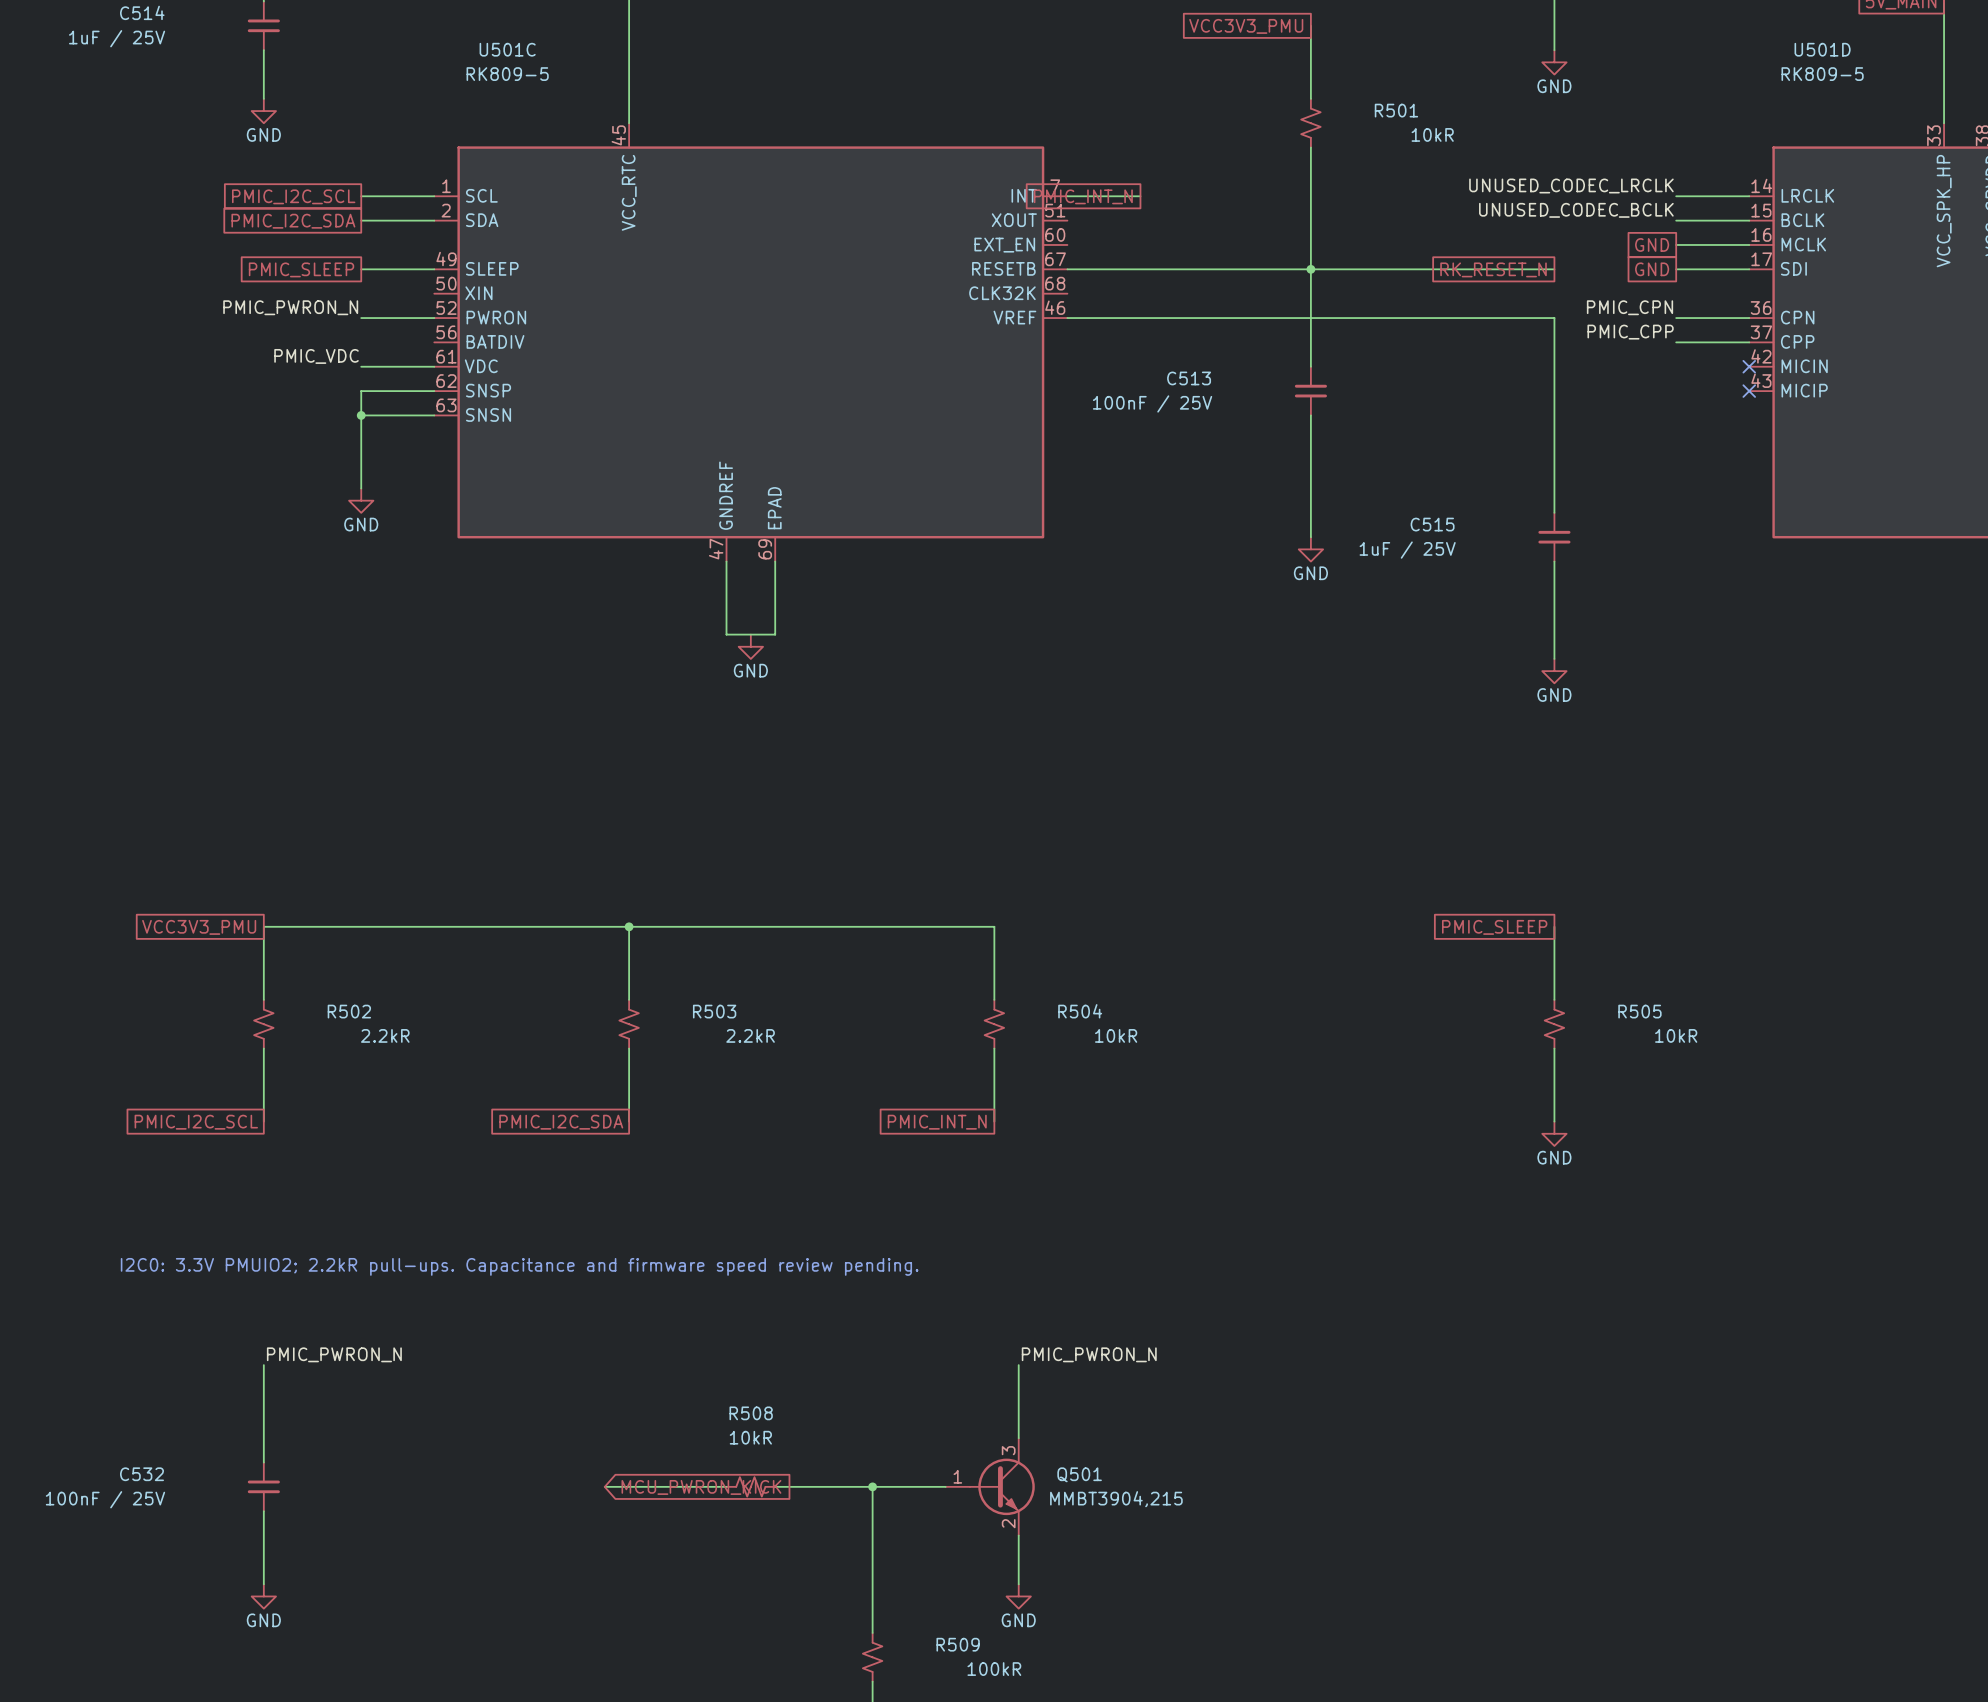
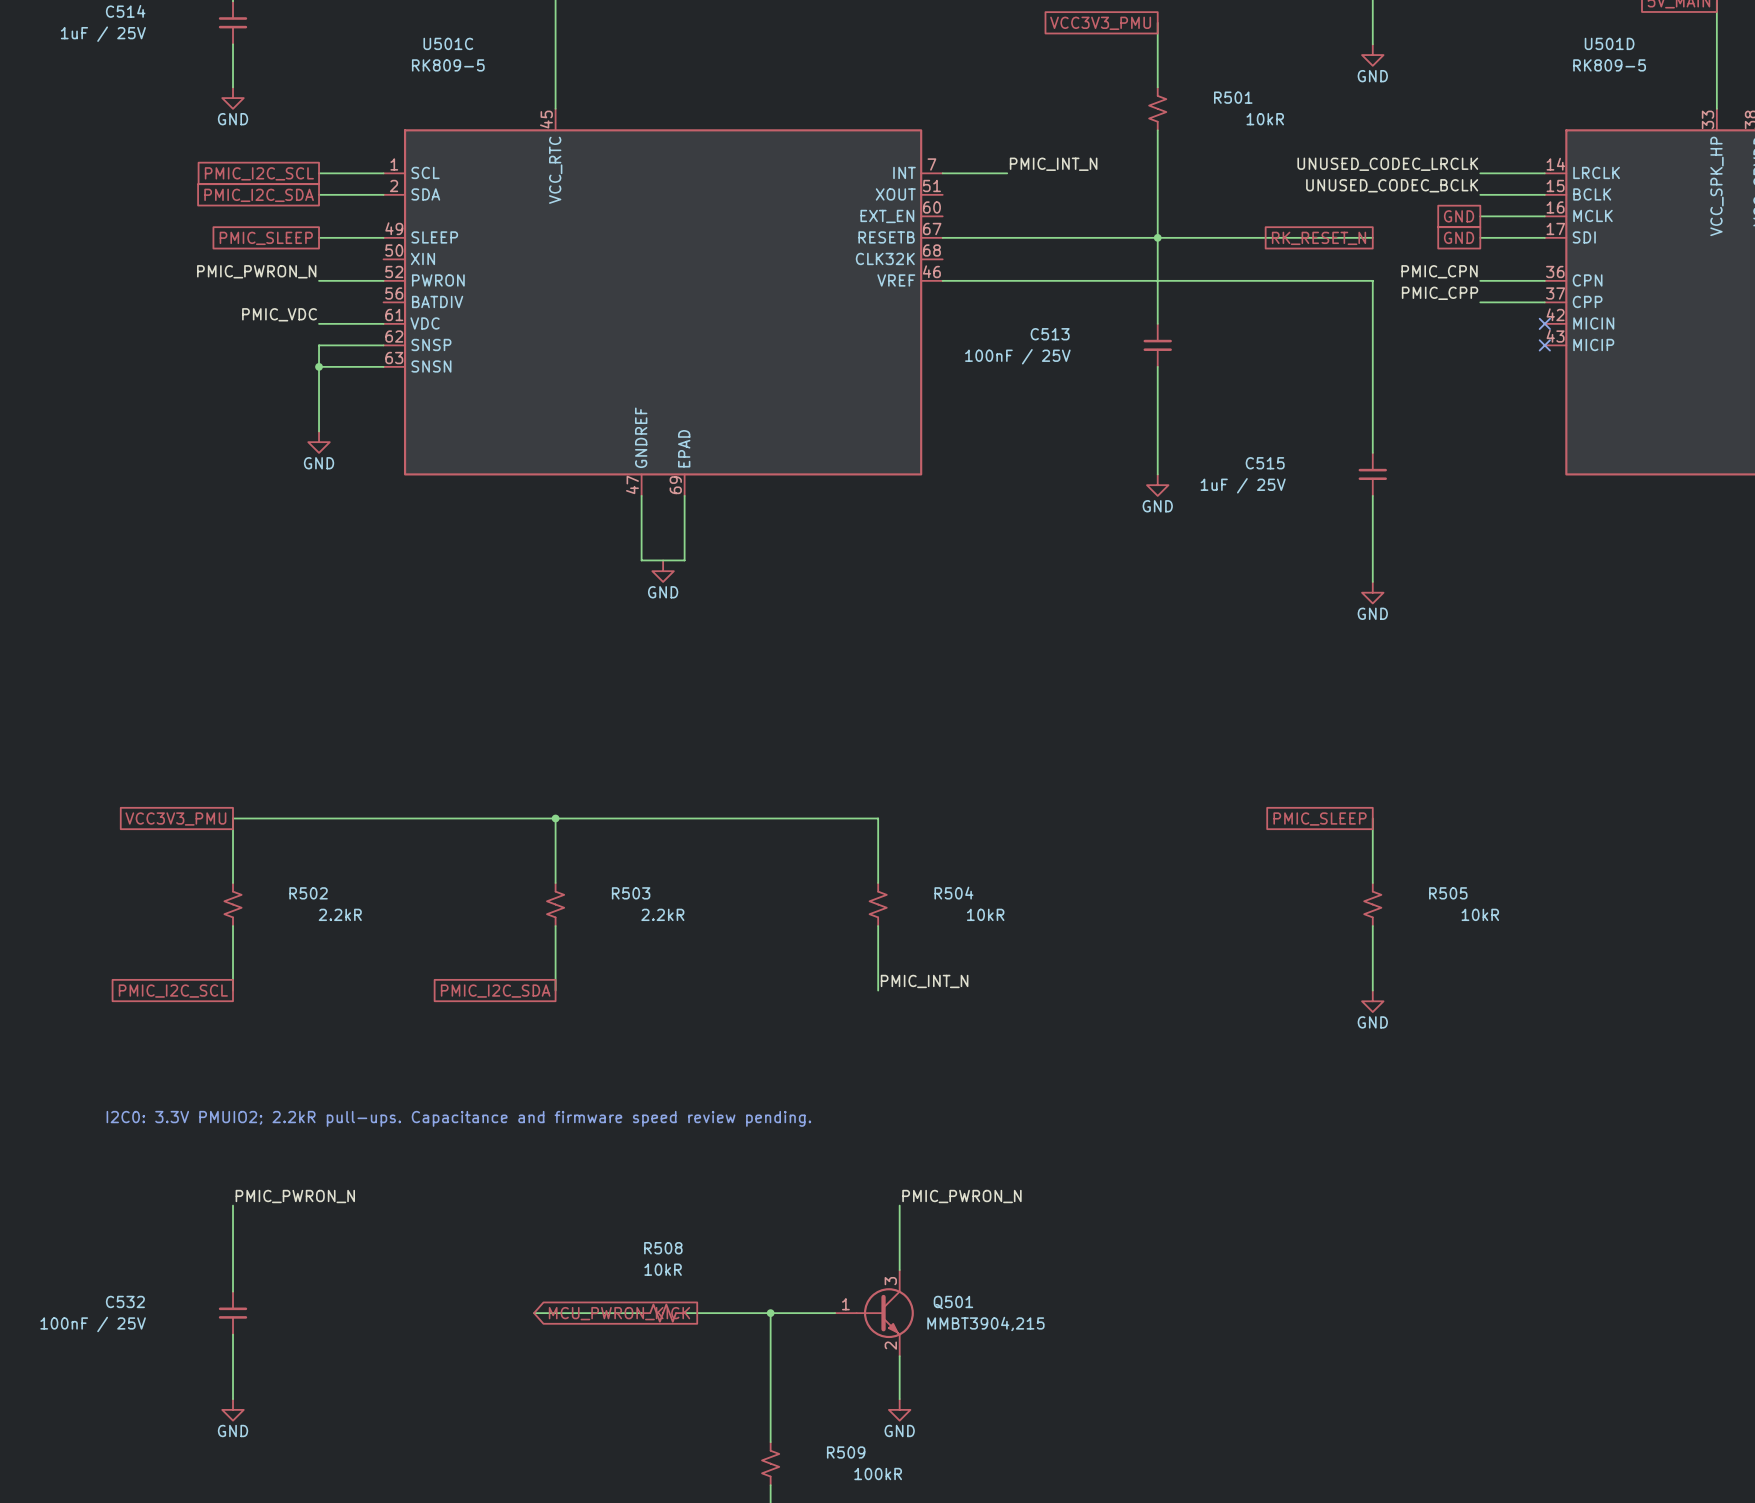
label: none -> PMIC_INT_N (1053, 164)
global label: PMIC_INT_N (1083, 196) -> none
label: none -> PMIC_INT_N (924, 981)
global label: PMIC_INT_N (937, 1122) -> none

